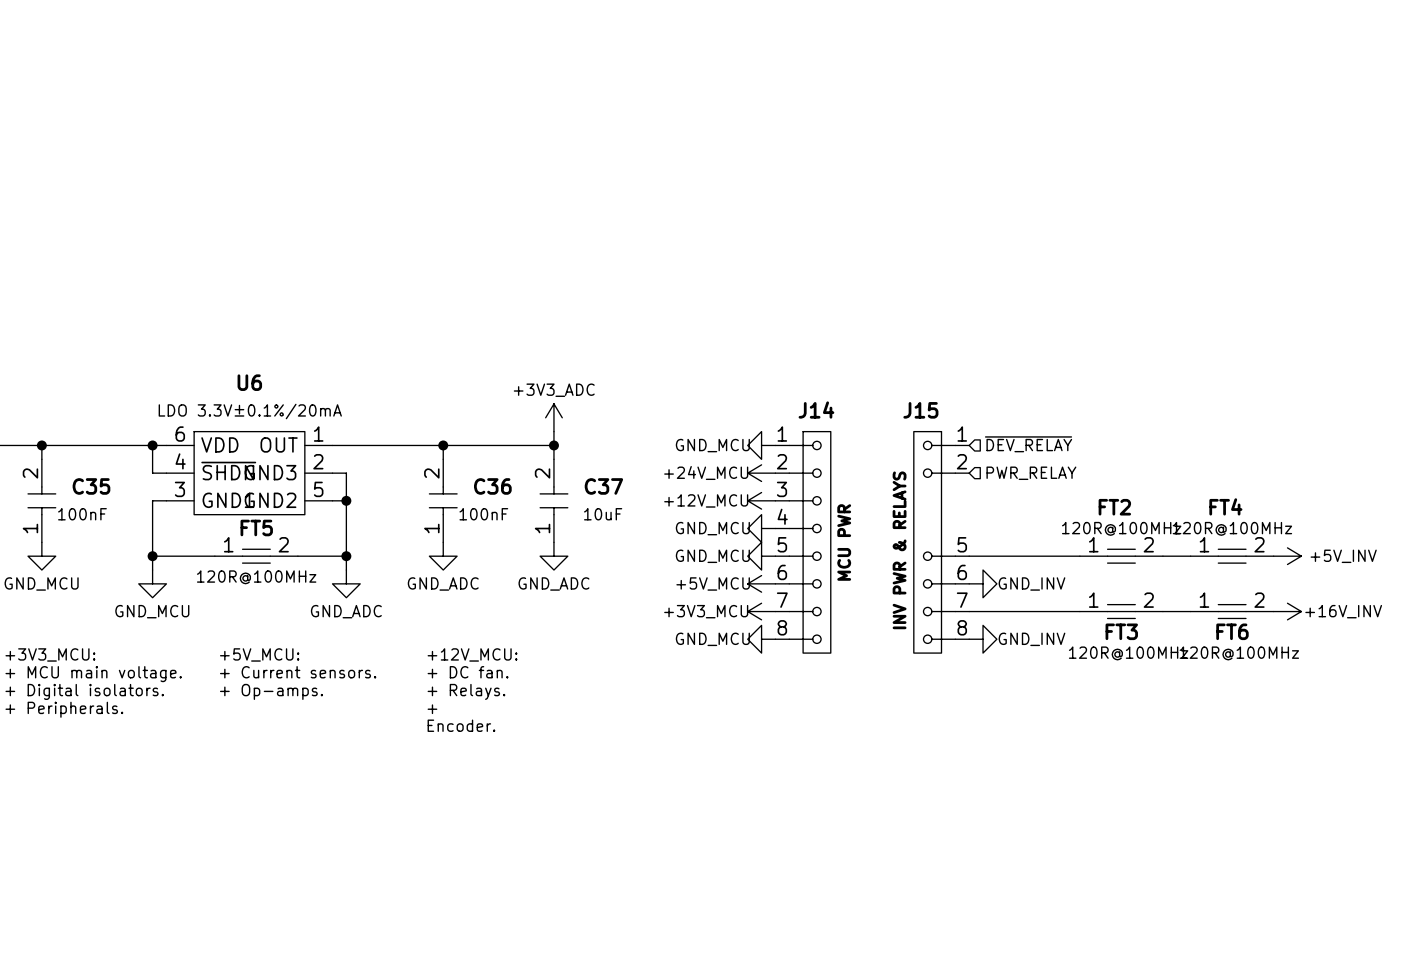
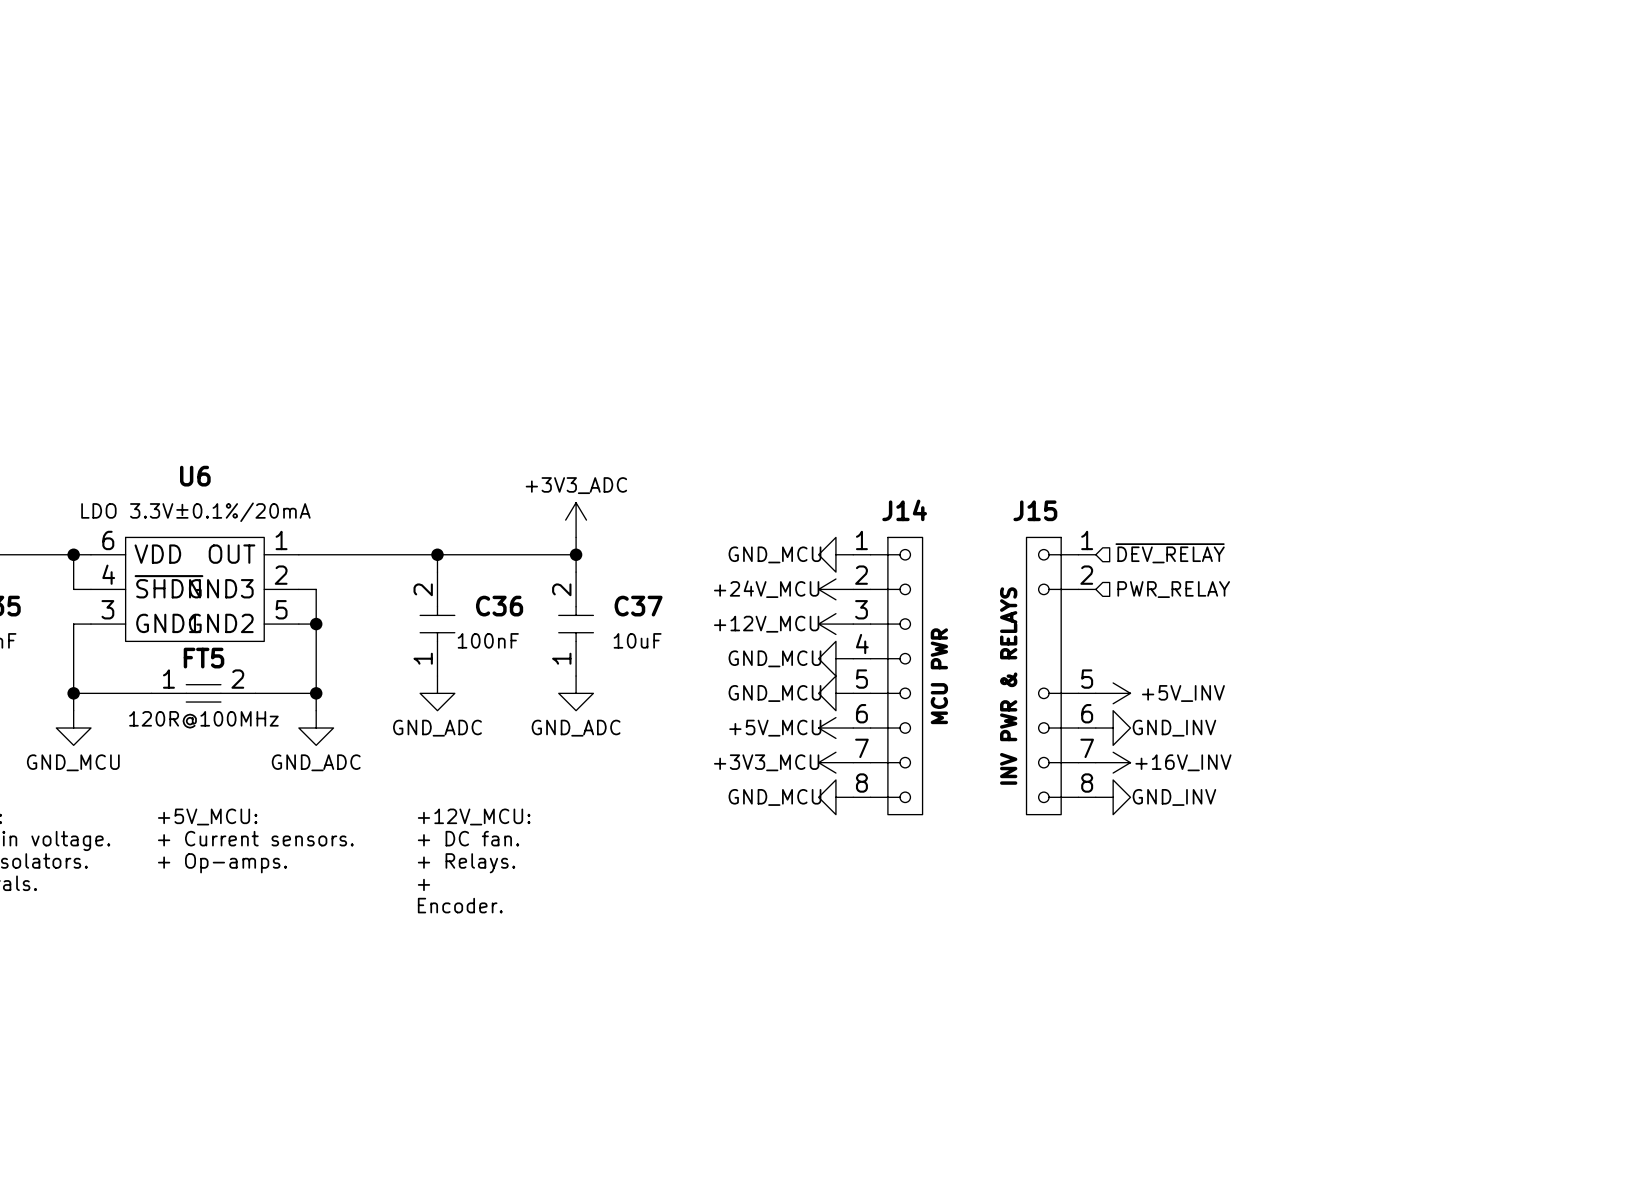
wire: (969, 556) (1079, 556) -> none
power symbol: none -> +5V_INV (1113, 693)
FT2: 120R@100MHz (1121, 556) -> none
wire: (1162, 556) (1190, 556) -> none
FT4: 120R@100MHz (1232, 556) -> none
power symbol: +5V_INV (1287, 556) -> none
wire: (969, 611) (1079, 611) -> none
power symbol: none -> +16V_INV (1113, 762)
FT3: 120R@100MHz (1121, 611) -> none
wire: (1162, 611) (1190, 611) -> none
FT6: 120R@100MHz (1232, 611) -> none
power symbol: +16V_INV (1287, 611) -> none

